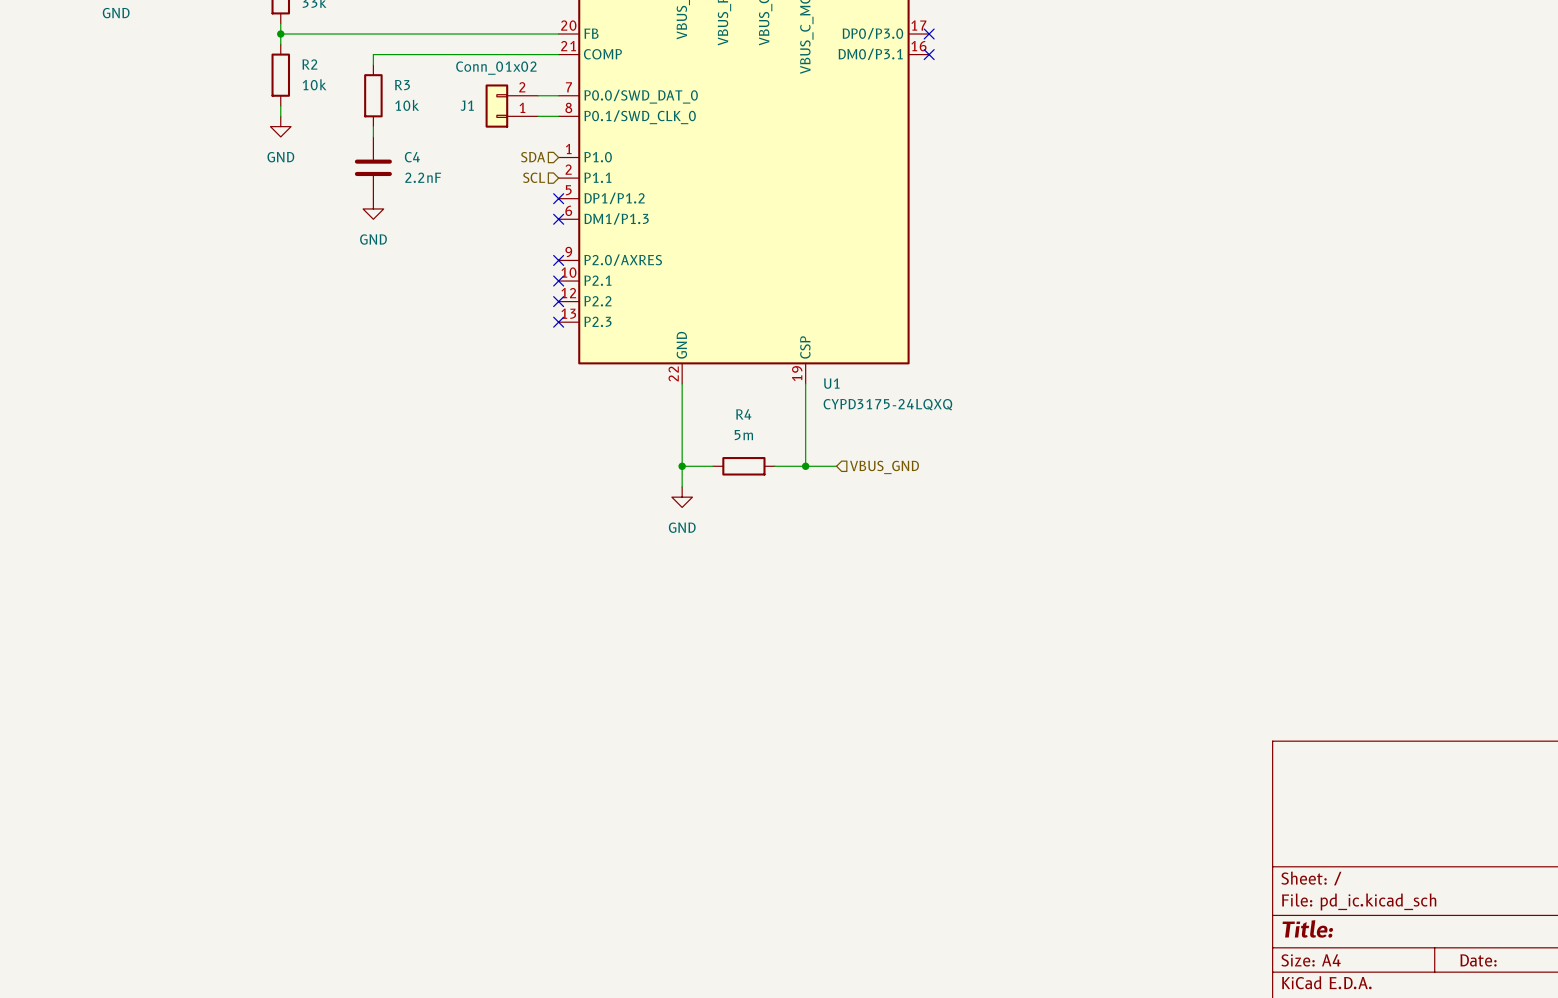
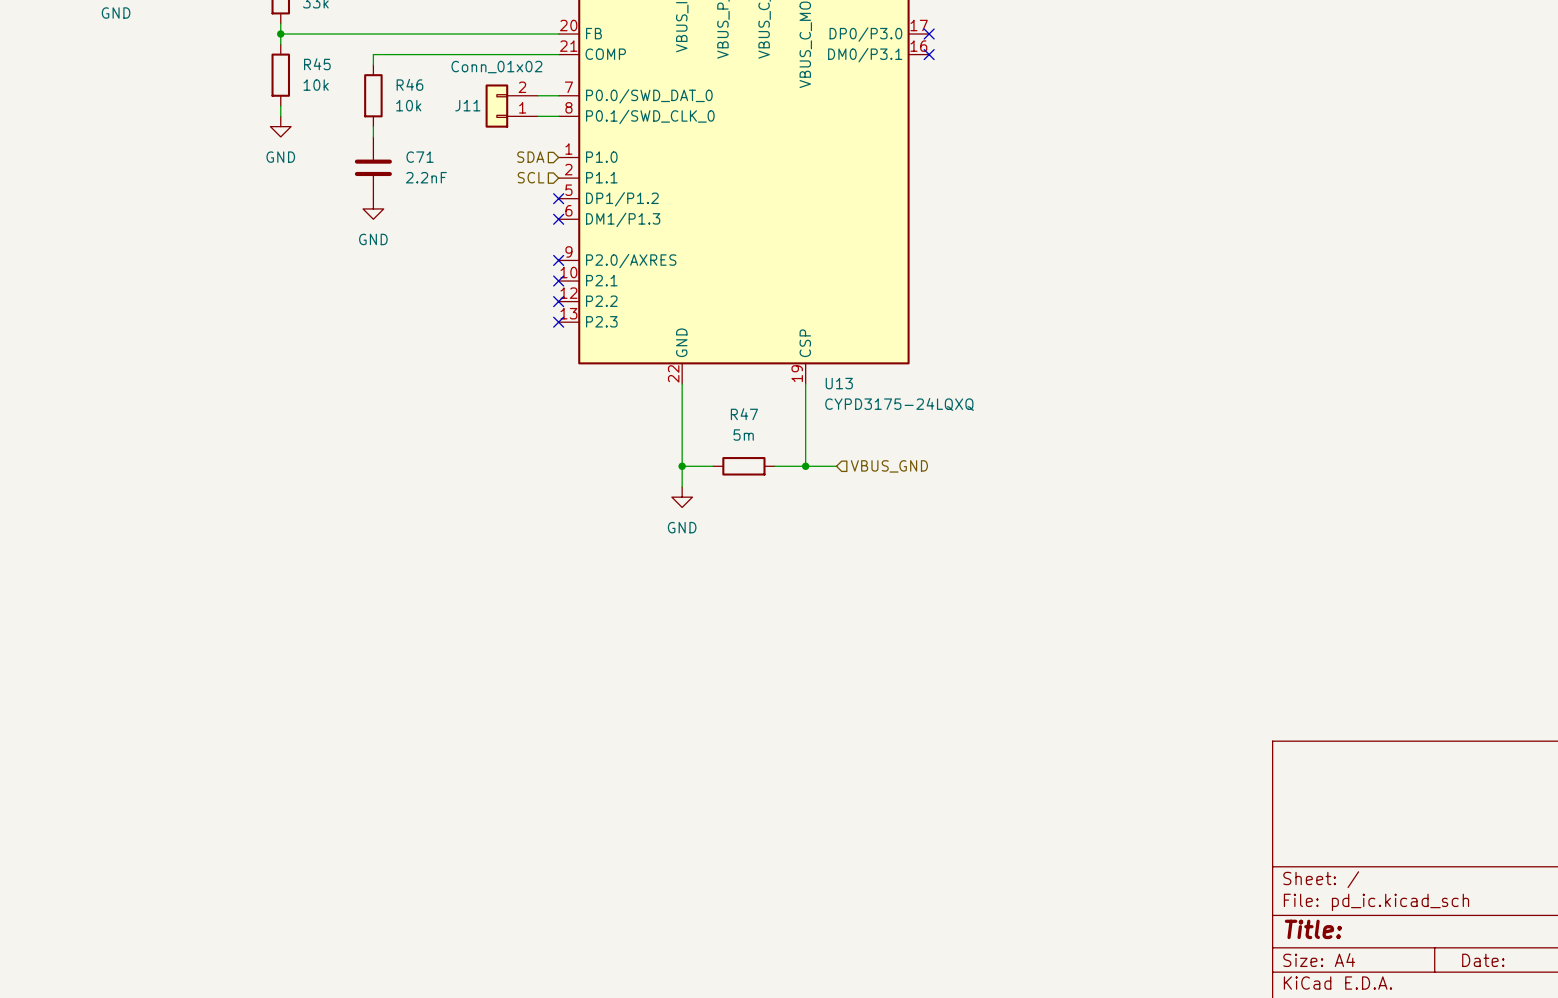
R2 name: R2 (309, 64) -> R45 (317, 64)
R3 name: R3 (402, 85) -> R46 (409, 84)
J1 name: J1 (467, 105) -> J11 (467, 105)
C4 name: C4 (412, 157) -> C71 (420, 157)
U1 name: U1 (831, 383) -> U13 (839, 383)
R4 name: R4 (743, 414) -> R47 (744, 414)

